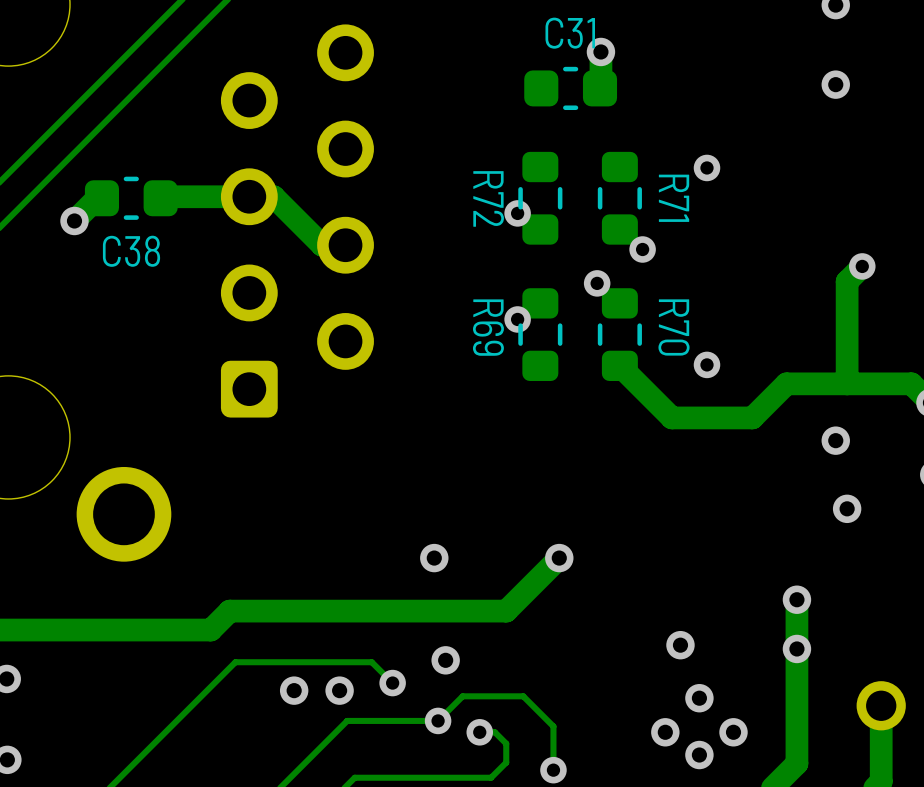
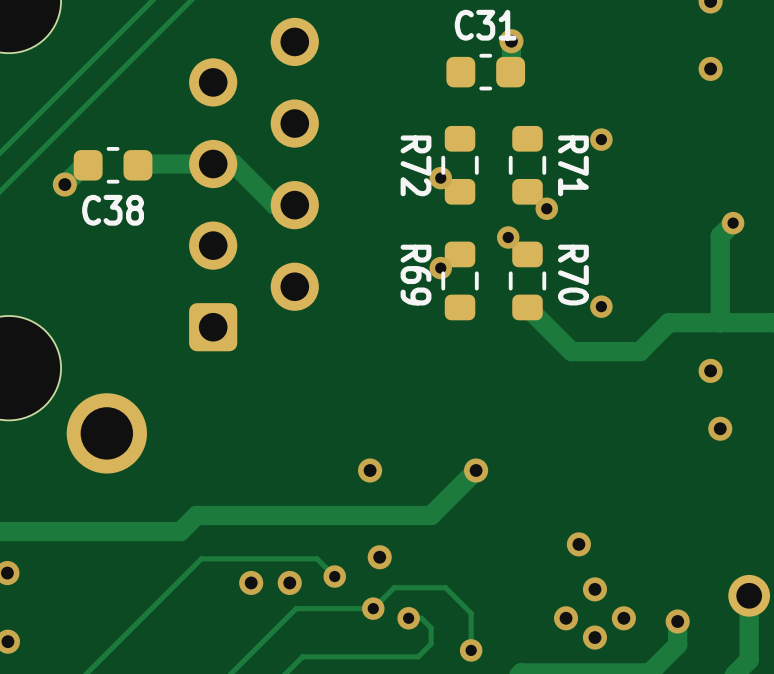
track: (796, 599) (796, 736) -> none
via: (796, 599) -> none
via: (796, 648) -> none
via: none -> (677, 621)

